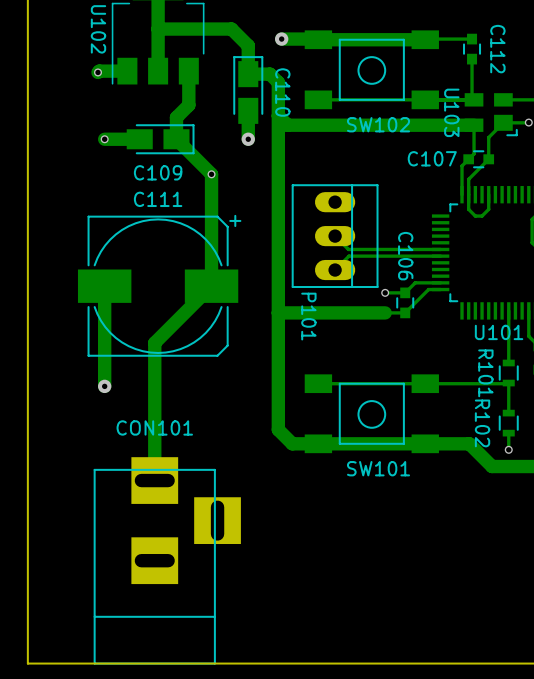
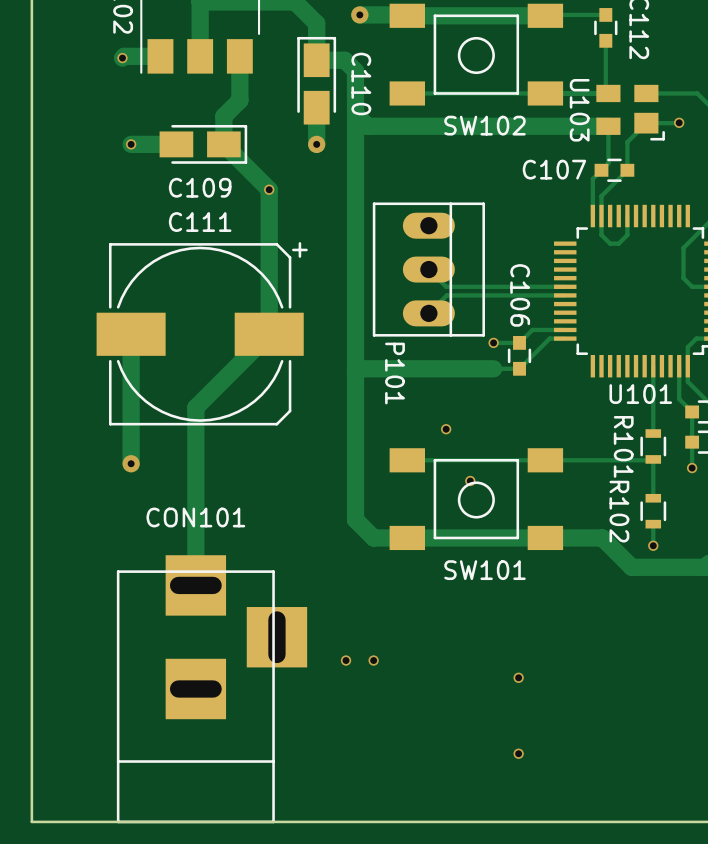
via: none -> (446, 429)
via: none -> (470, 481)
via: none -> (346, 660)
via: none -> (373, 660)
via: none -> (518, 677)
via: none -> (518, 753)

